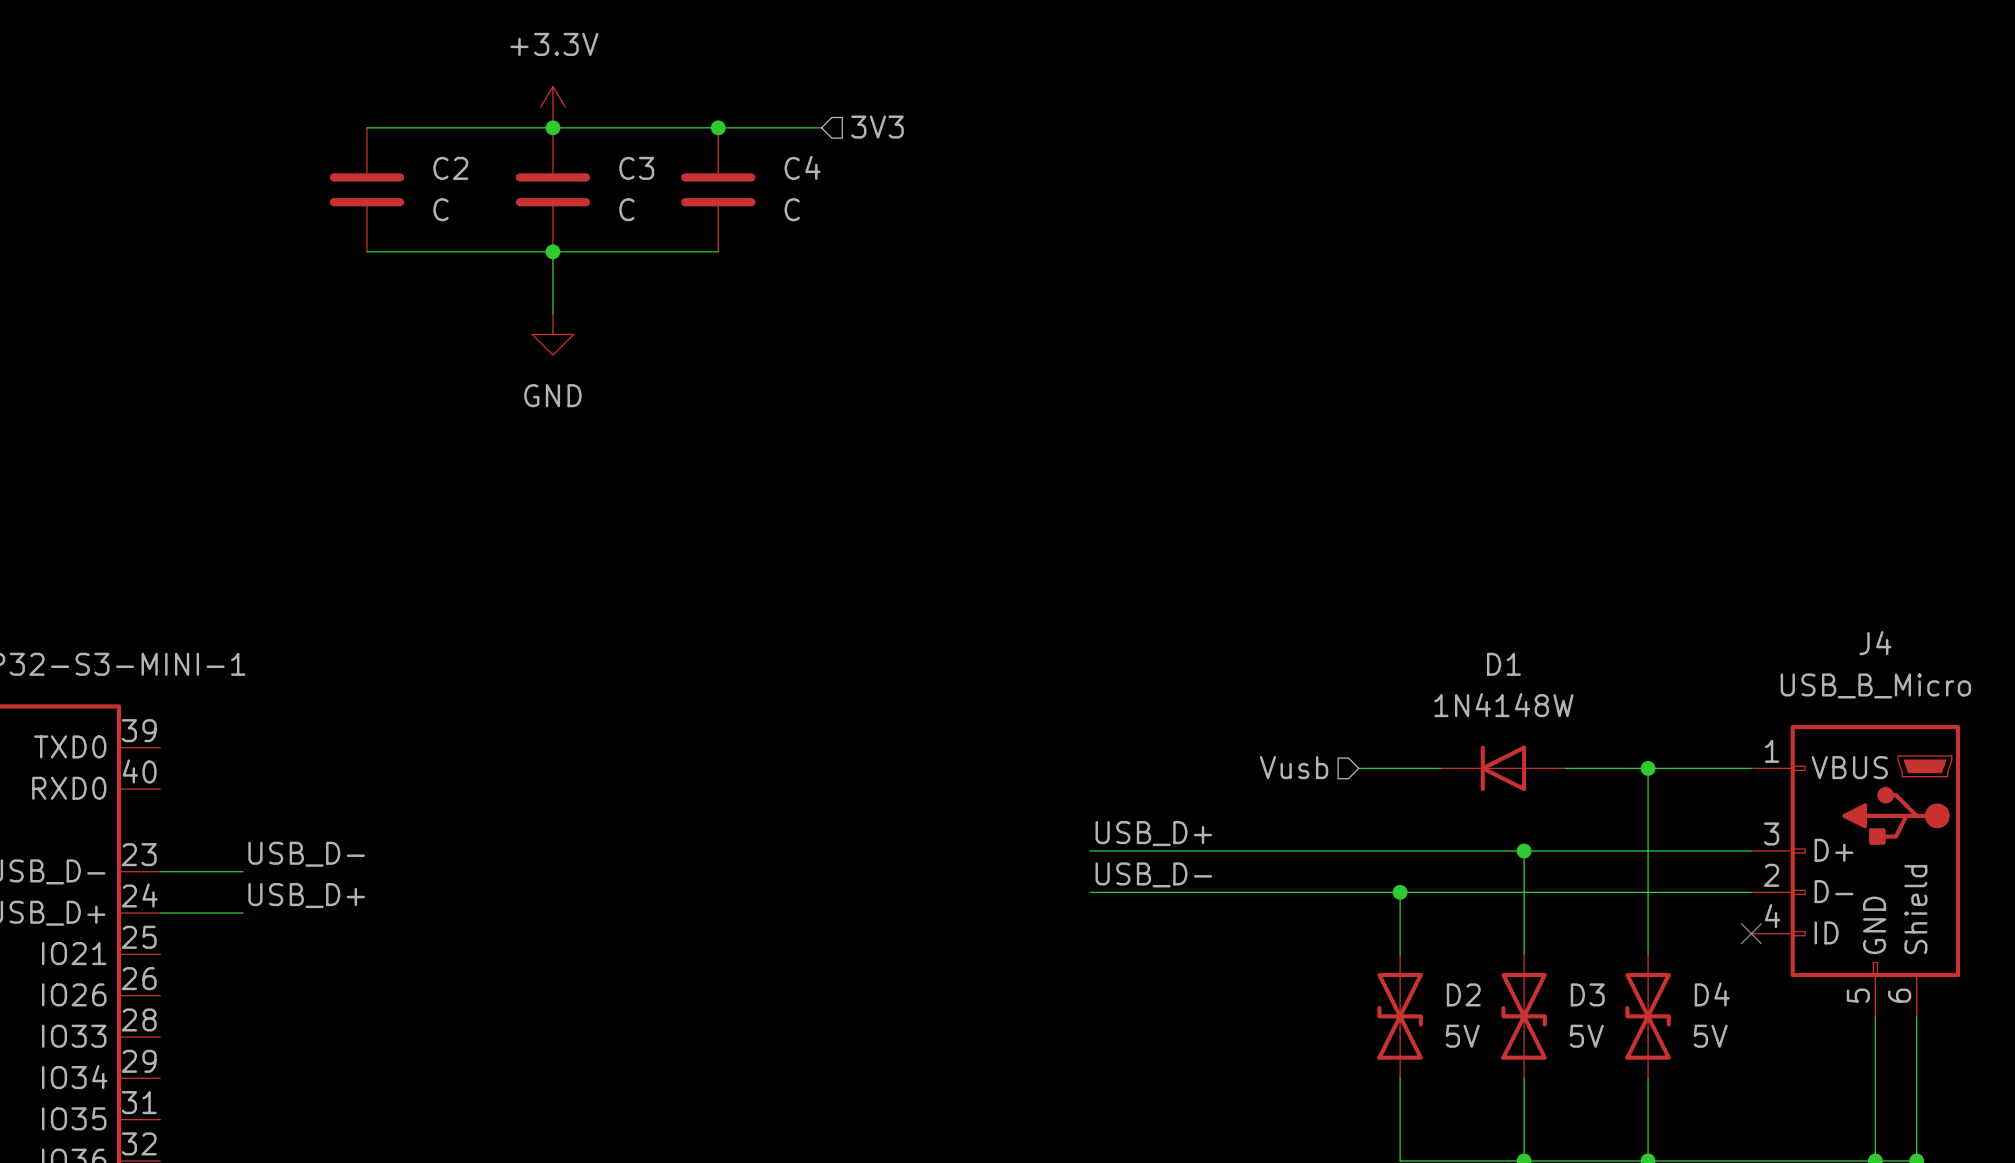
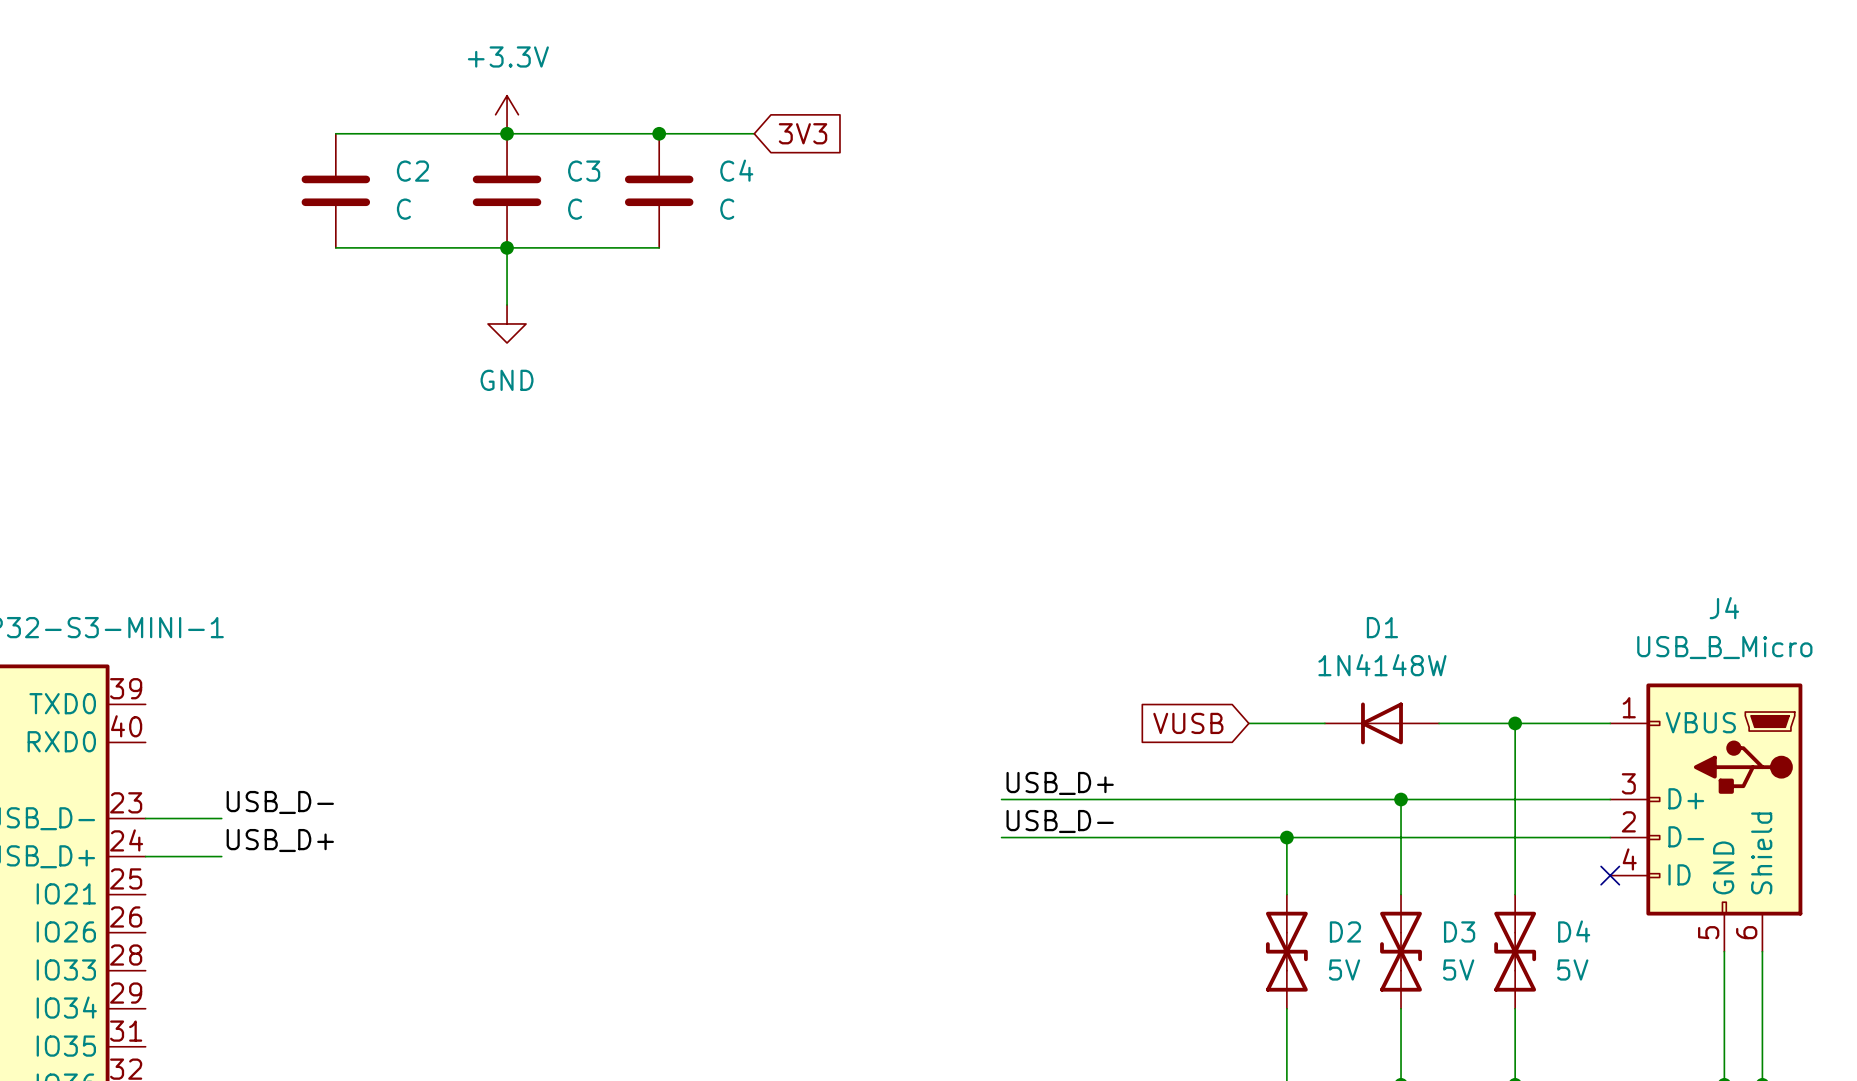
global label: none -> 3V3 (803, 133)
hierarchical label: 3V3 (877, 127) -> none
hierarchical label: Vusb (1294, 767) -> none
global label: none -> VUSB (1188, 723)

